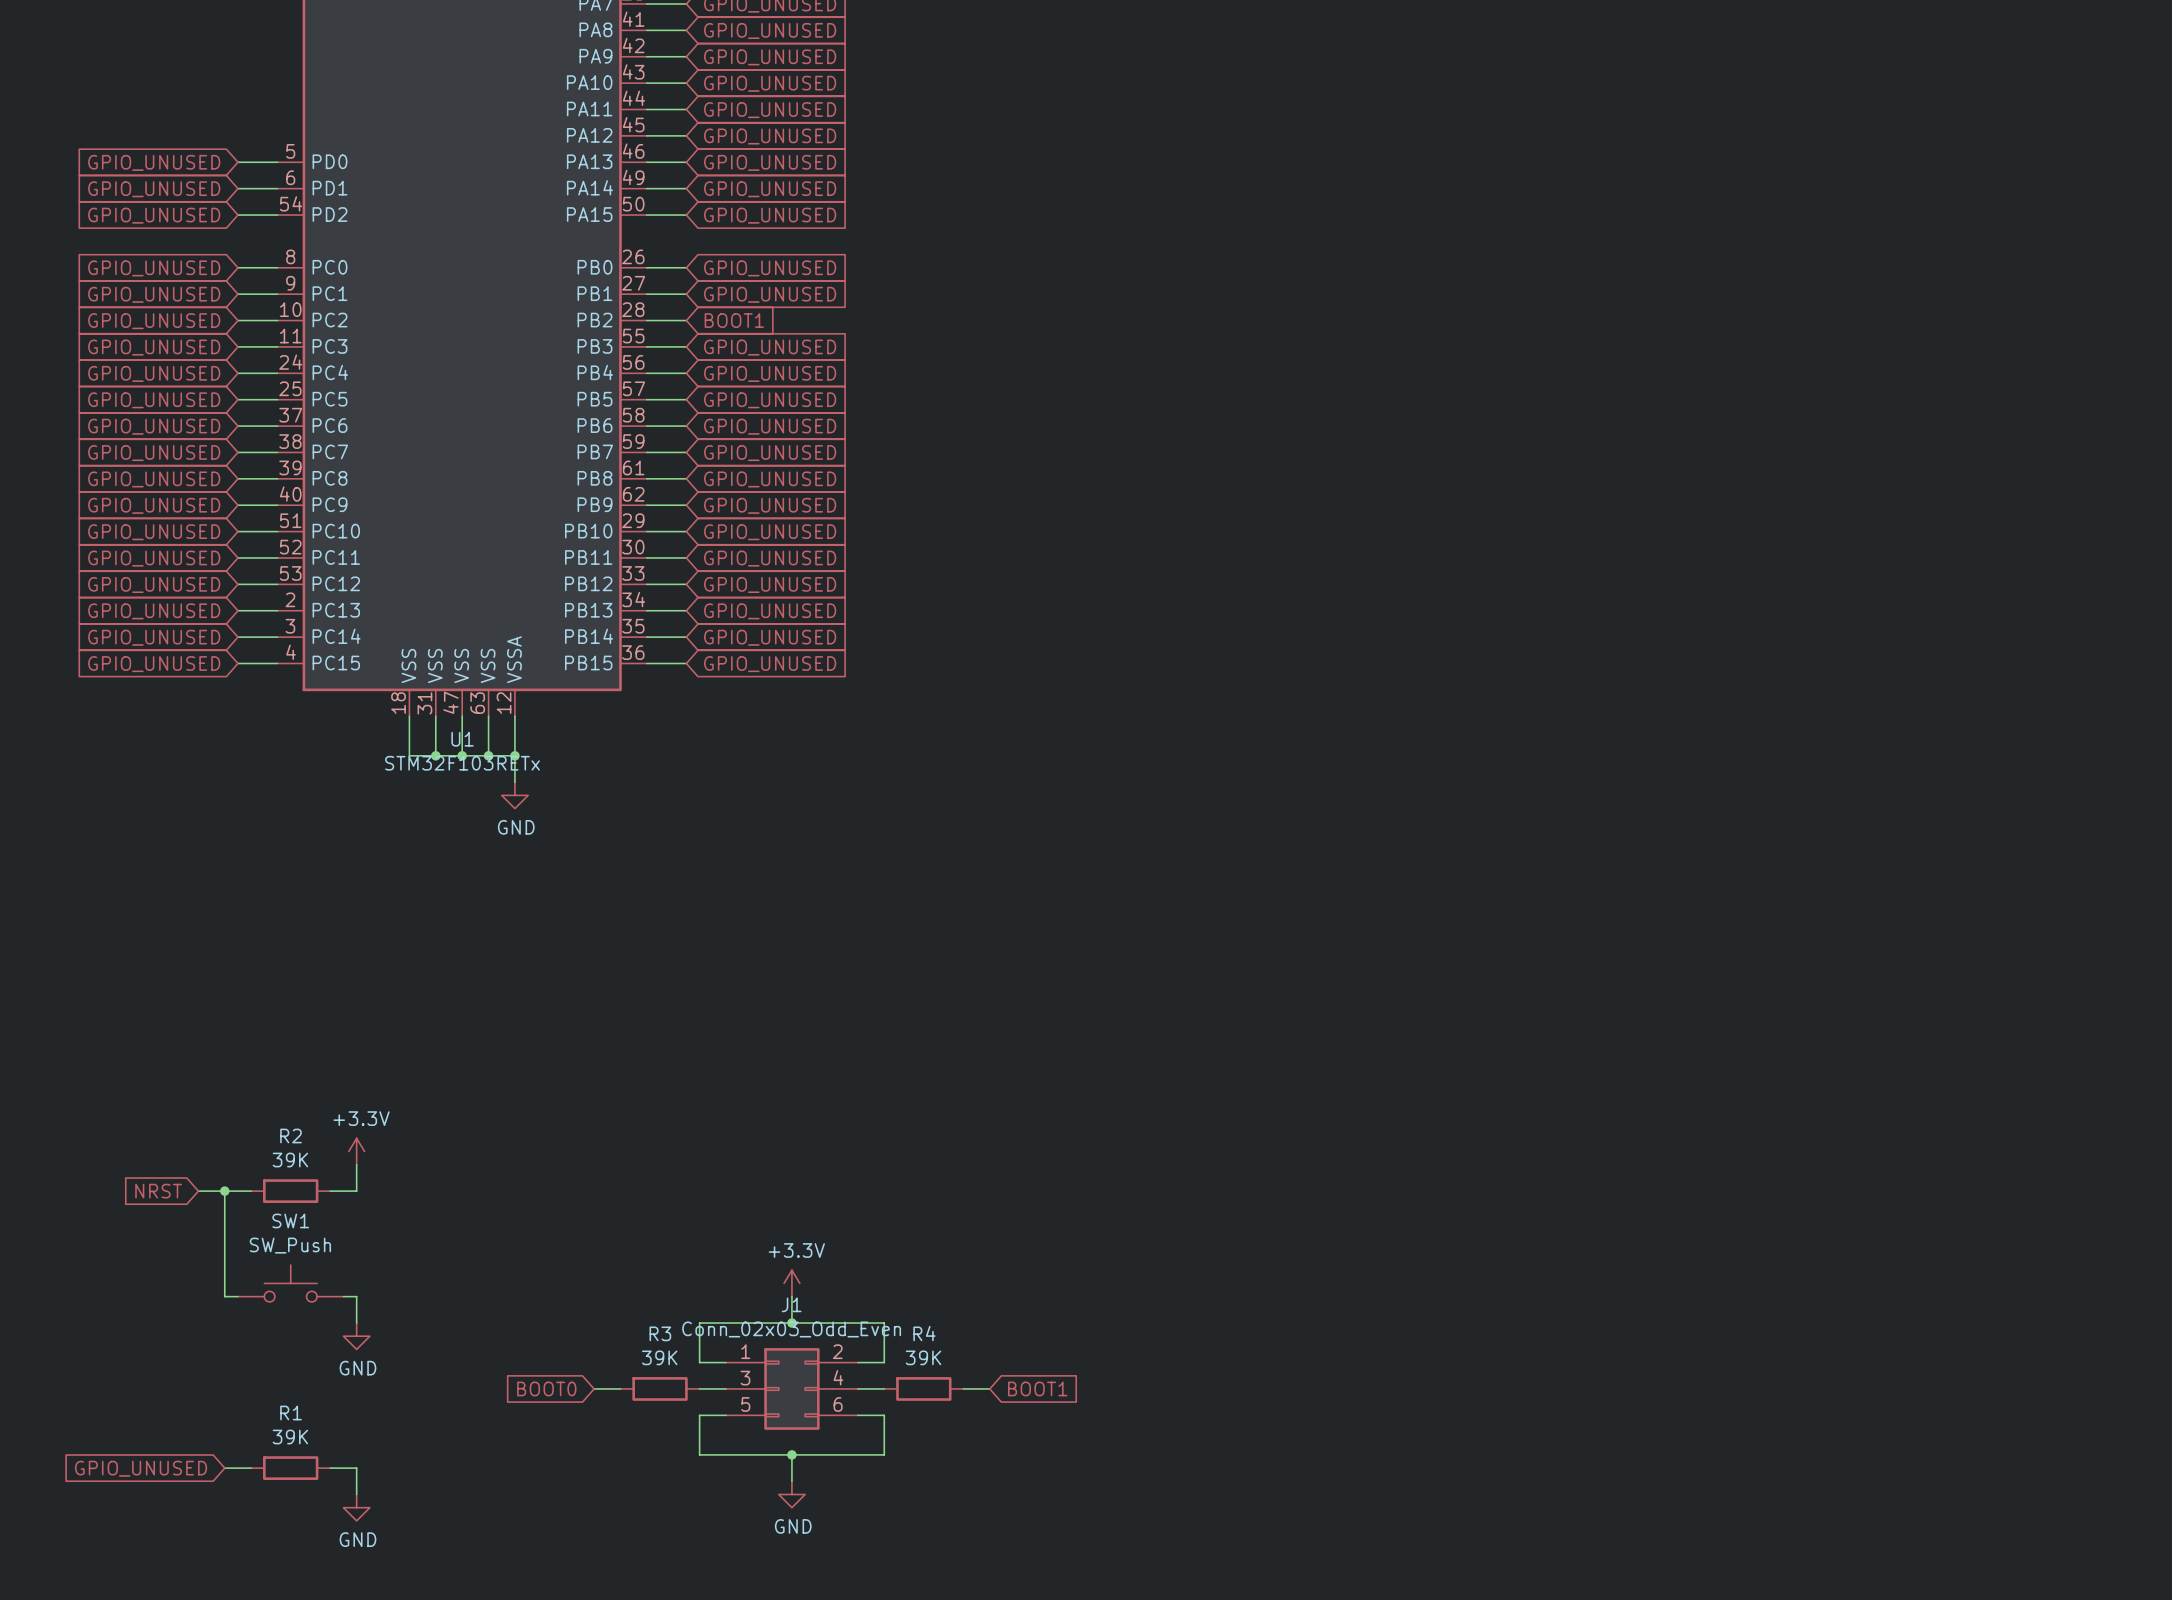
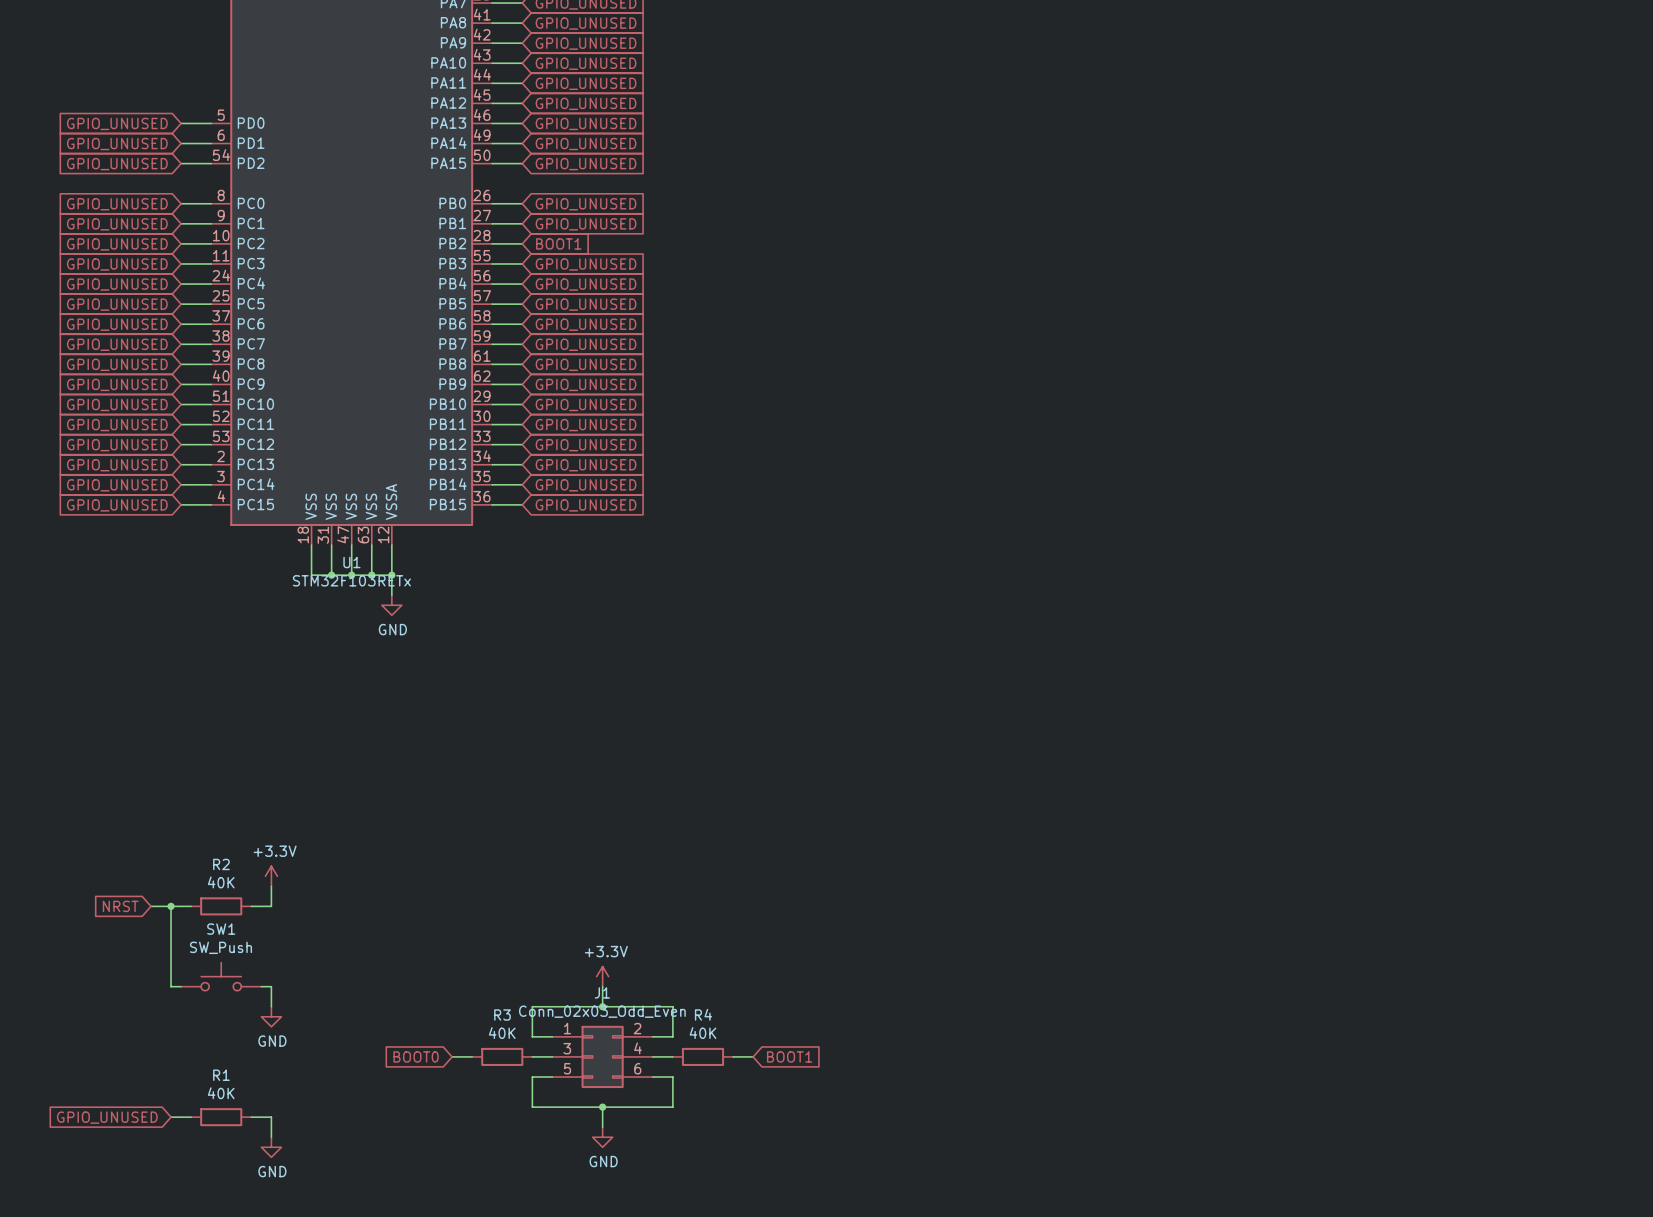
R2 value: 39K (290, 1160) -> 40K (221, 882)
R3 value: 39K (659, 1357) -> 40K (502, 1033)
R4 value: 39K (923, 1357) -> 40K (703, 1033)
R1 value: 39K (290, 1437) -> 40K (221, 1093)

